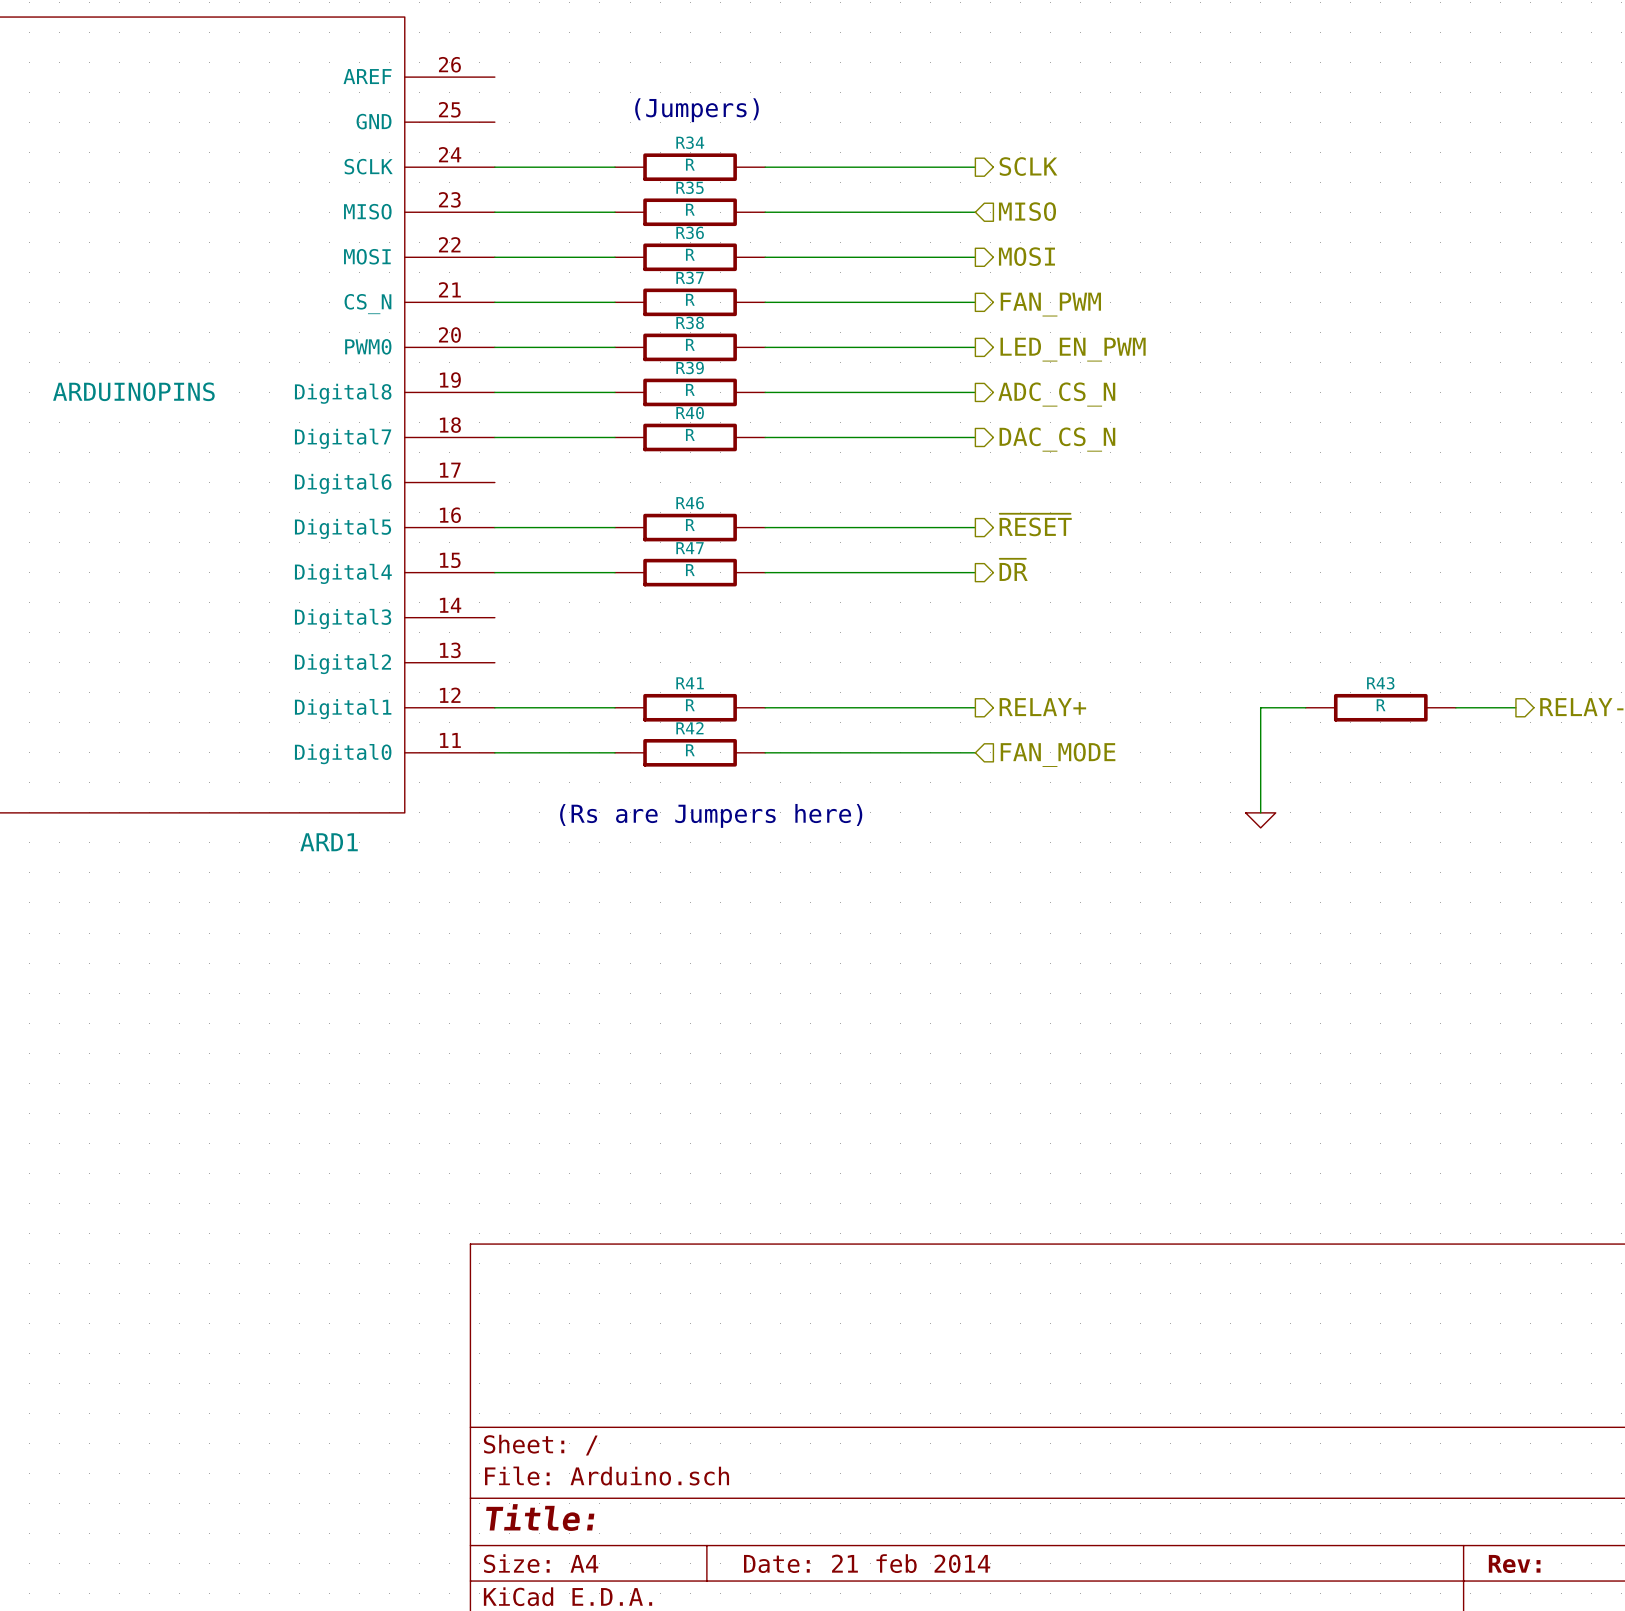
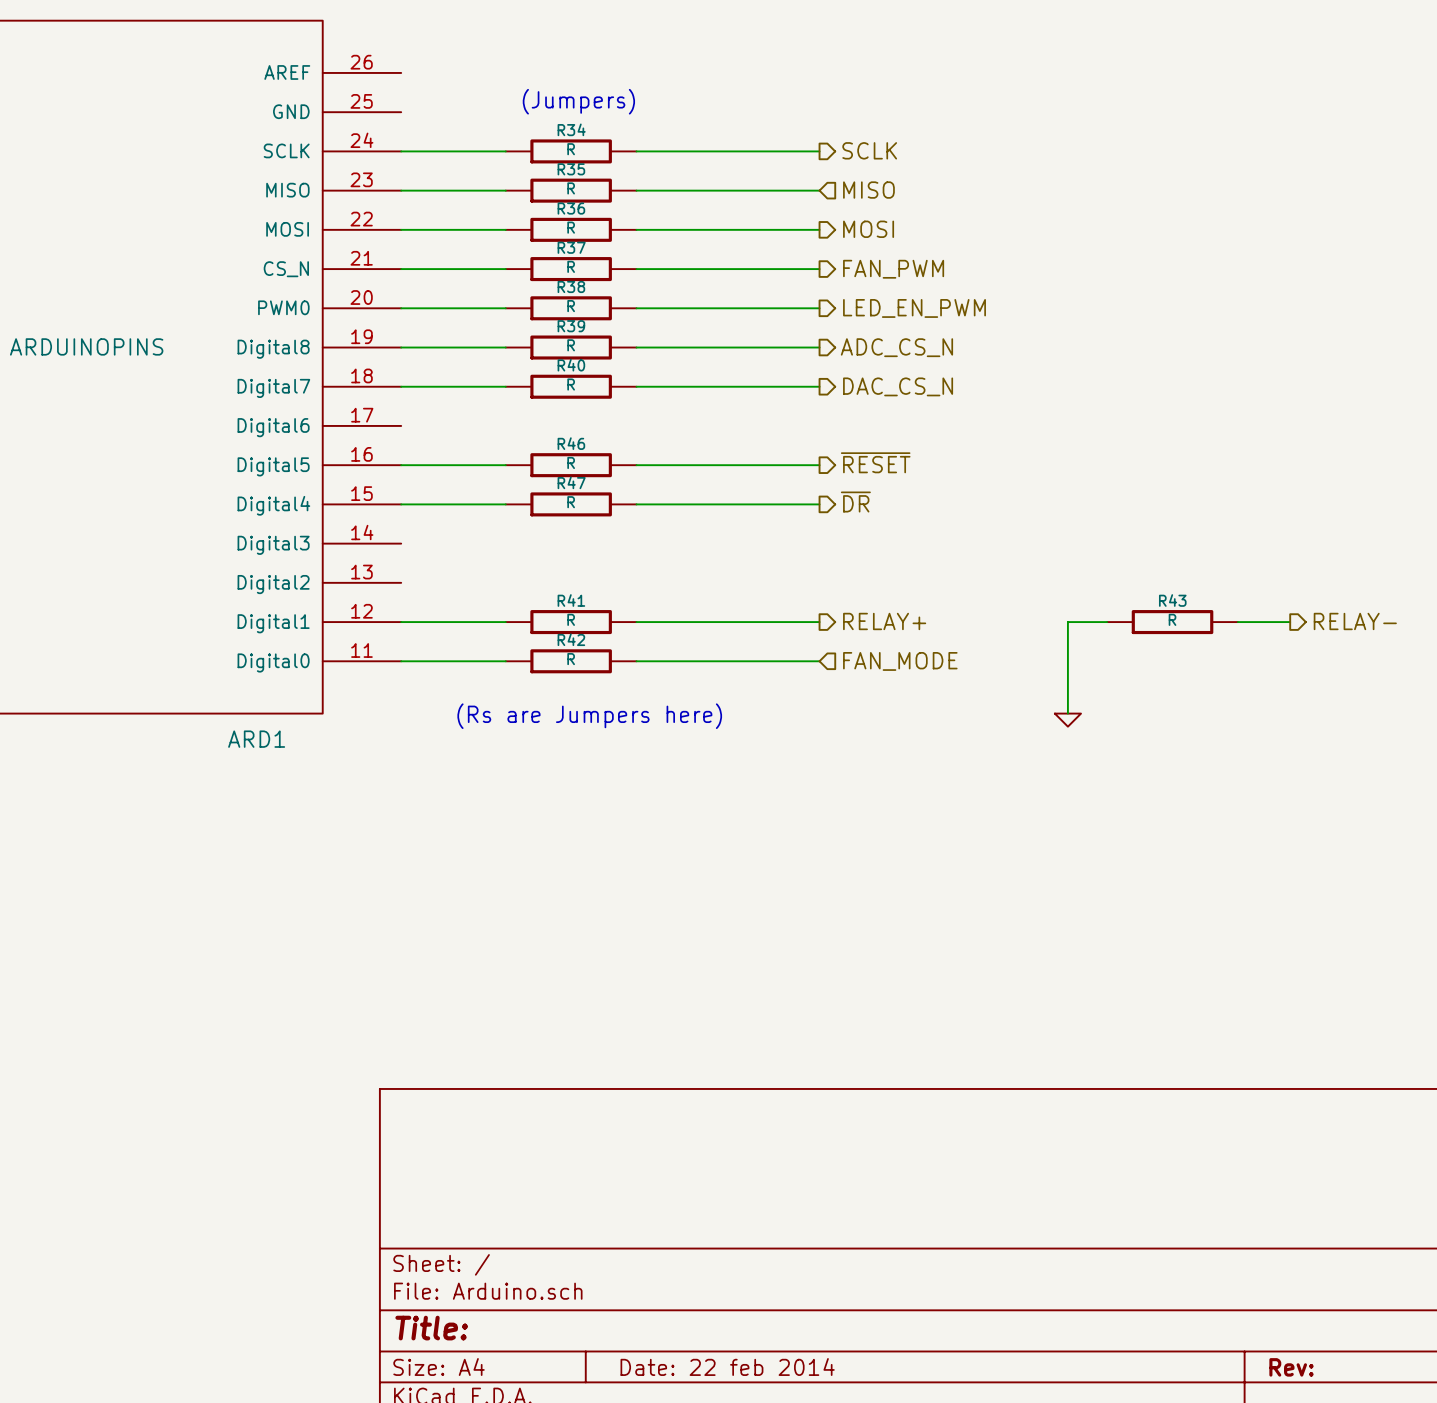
title block: Date: 21 feb 2014 (867, 1563) -> Date: 22 feb 2014 (727, 1367)

